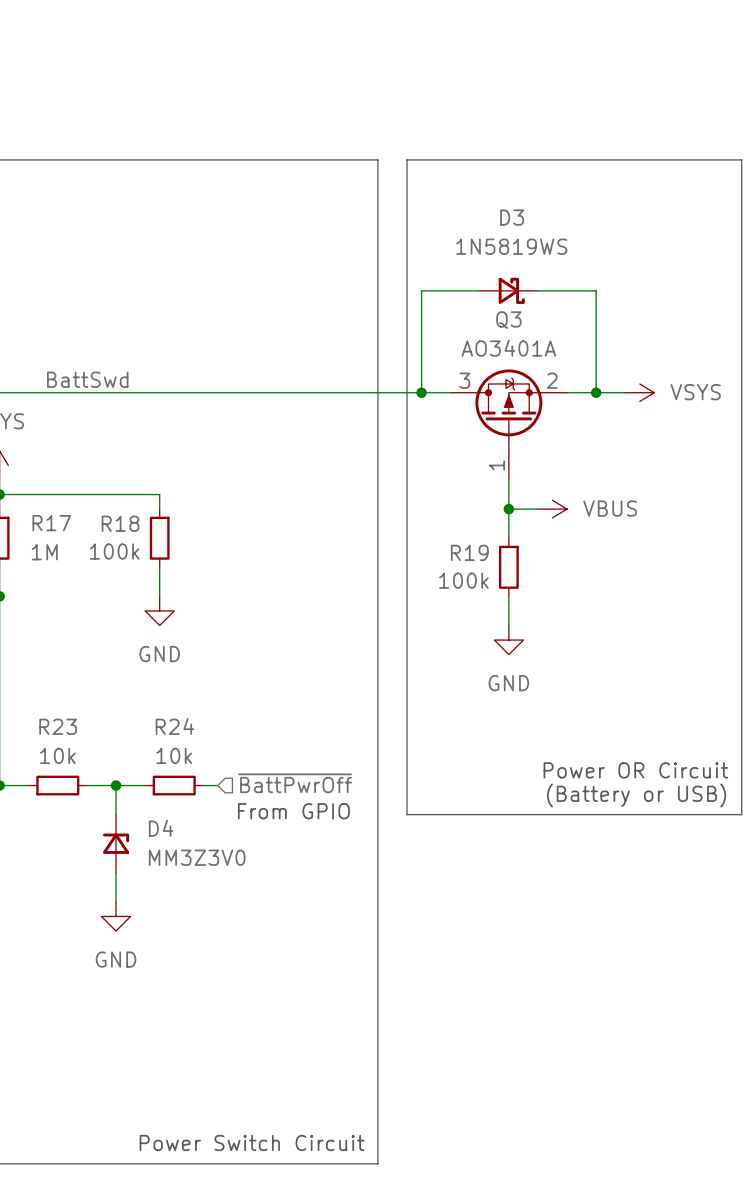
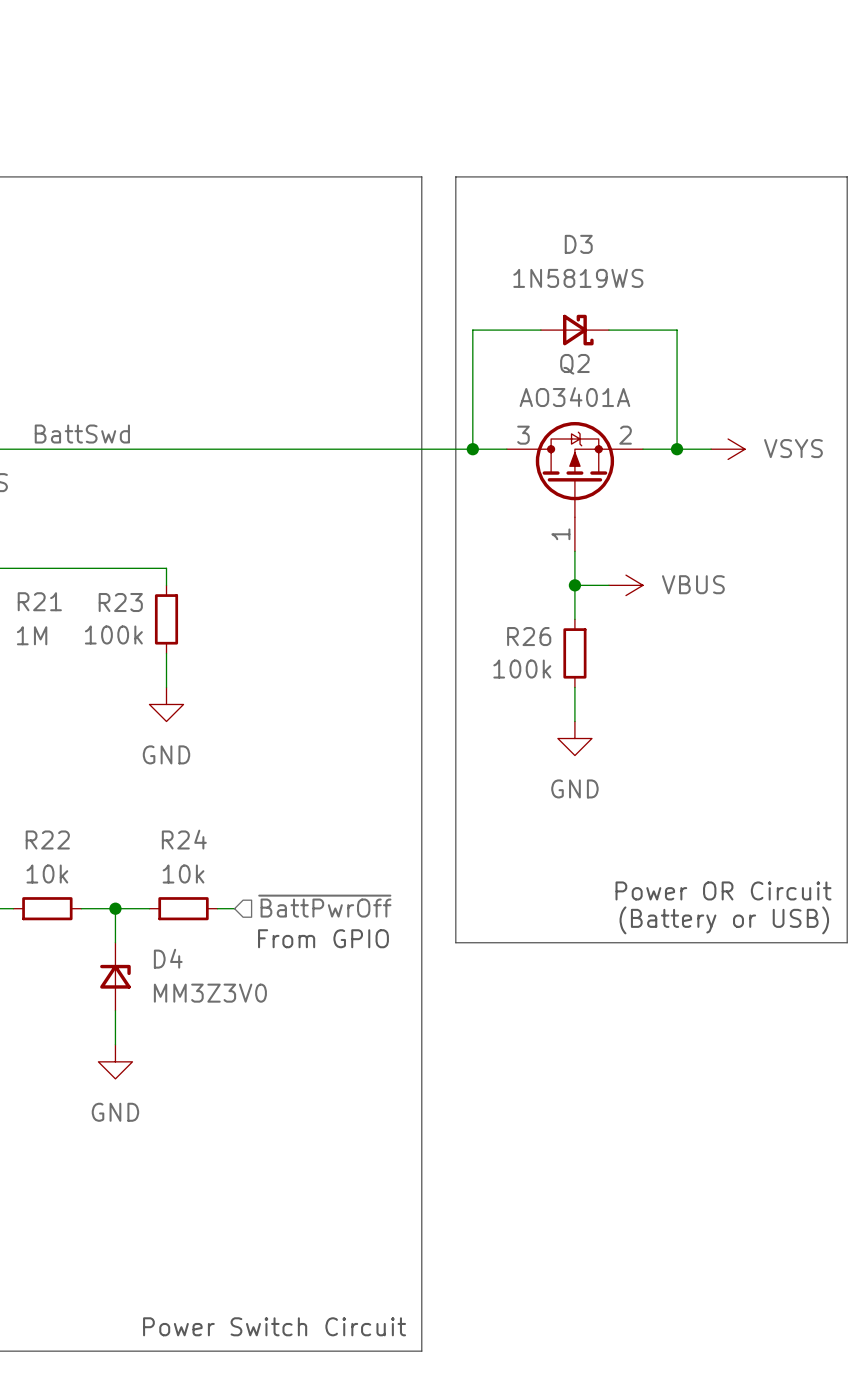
Q3 name: Q3 (508, 320) -> Q2 (574, 364)
R17 name: R17 (51, 523) -> R21 (39, 601)
R18 name: R18 (120, 523) -> R23 (120, 602)
R19 name: R19 (469, 552) -> R26 (529, 636)
R23 name: R23 (58, 726) -> R22 (47, 839)

